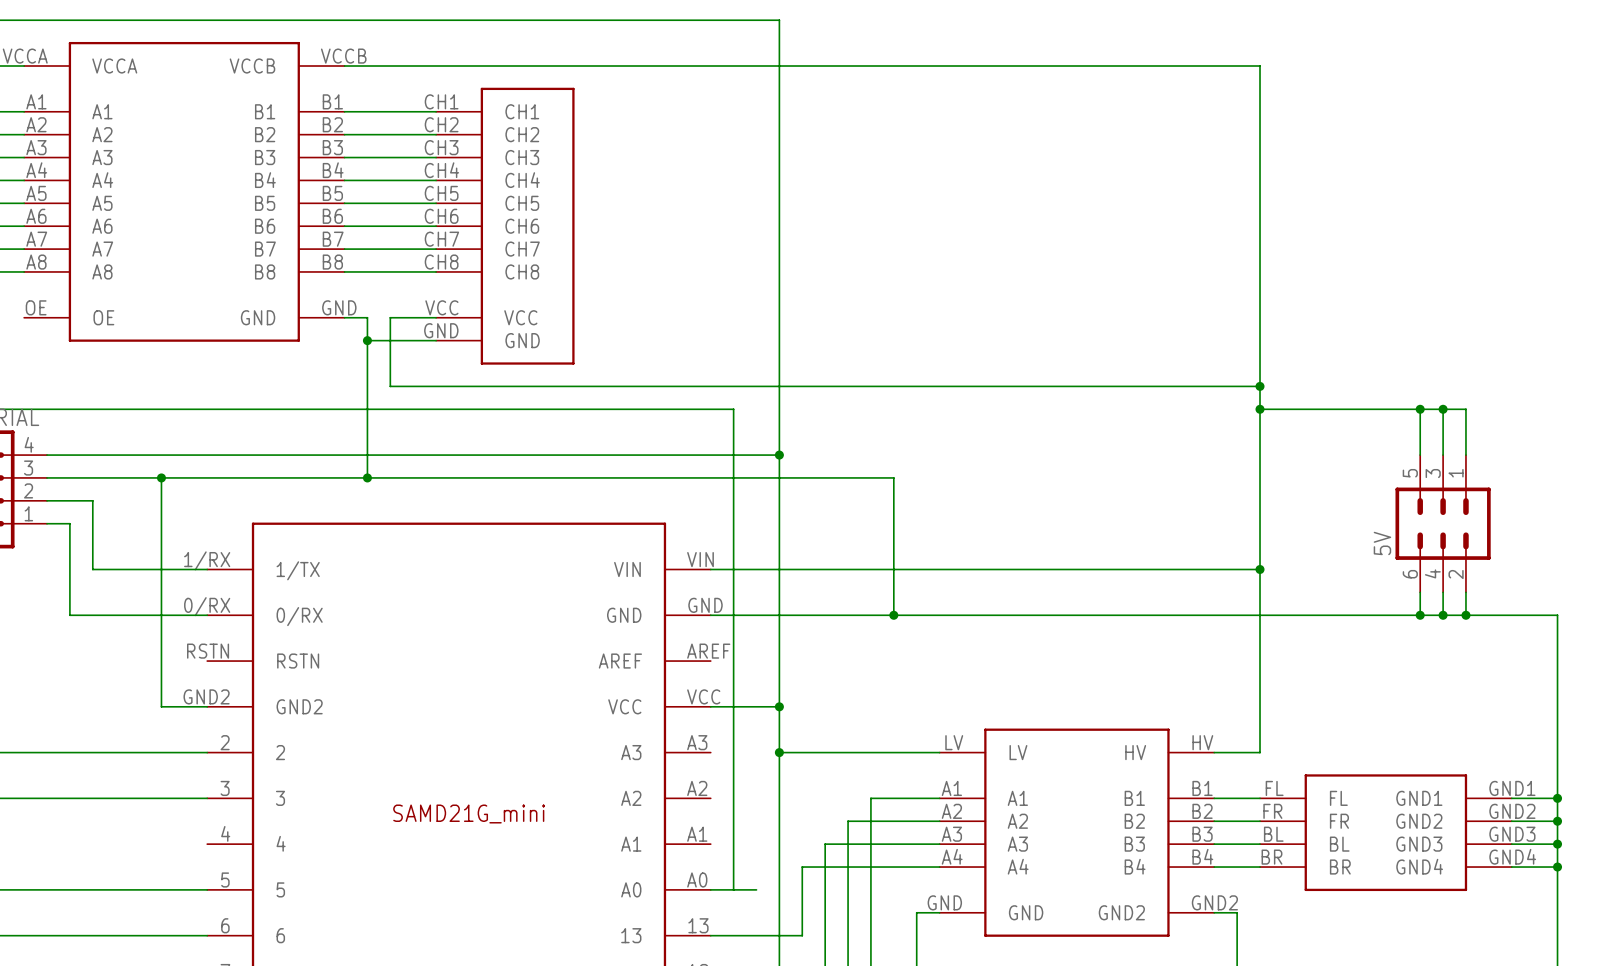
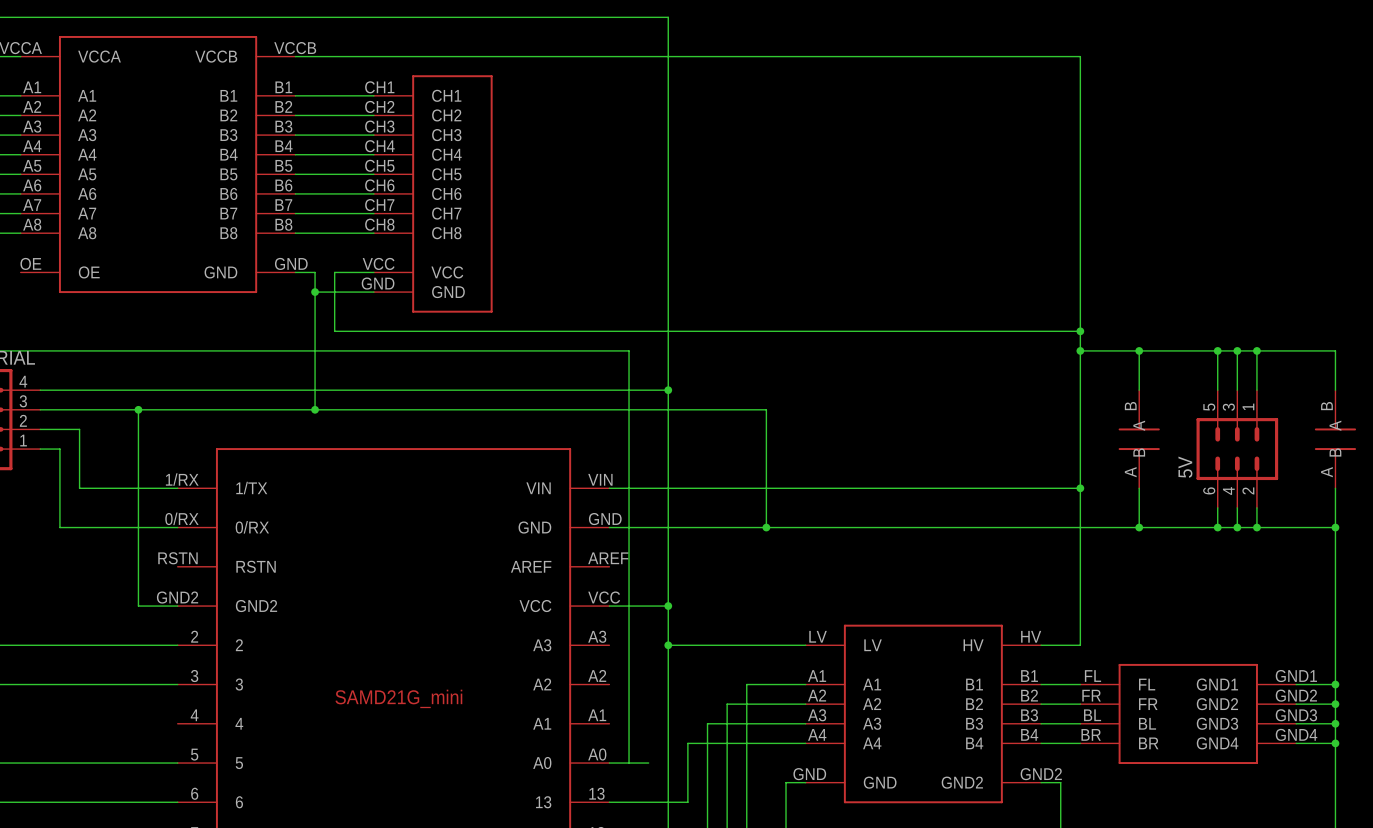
wire: none -> (1139, 350) (1139, 390)
junction: none -> (1139, 350)
wire: none -> (1256, 350) (1335, 350) (1335, 390)
junction: none -> (1256, 350)
part: none -> (1139, 439)
part: none -> (1335, 439)
wire: none -> (1139, 488) (1139, 527)
wire: none -> (1335, 488) (1335, 527)
junction: none -> (1139, 527)
junction: none -> (1335, 527)

